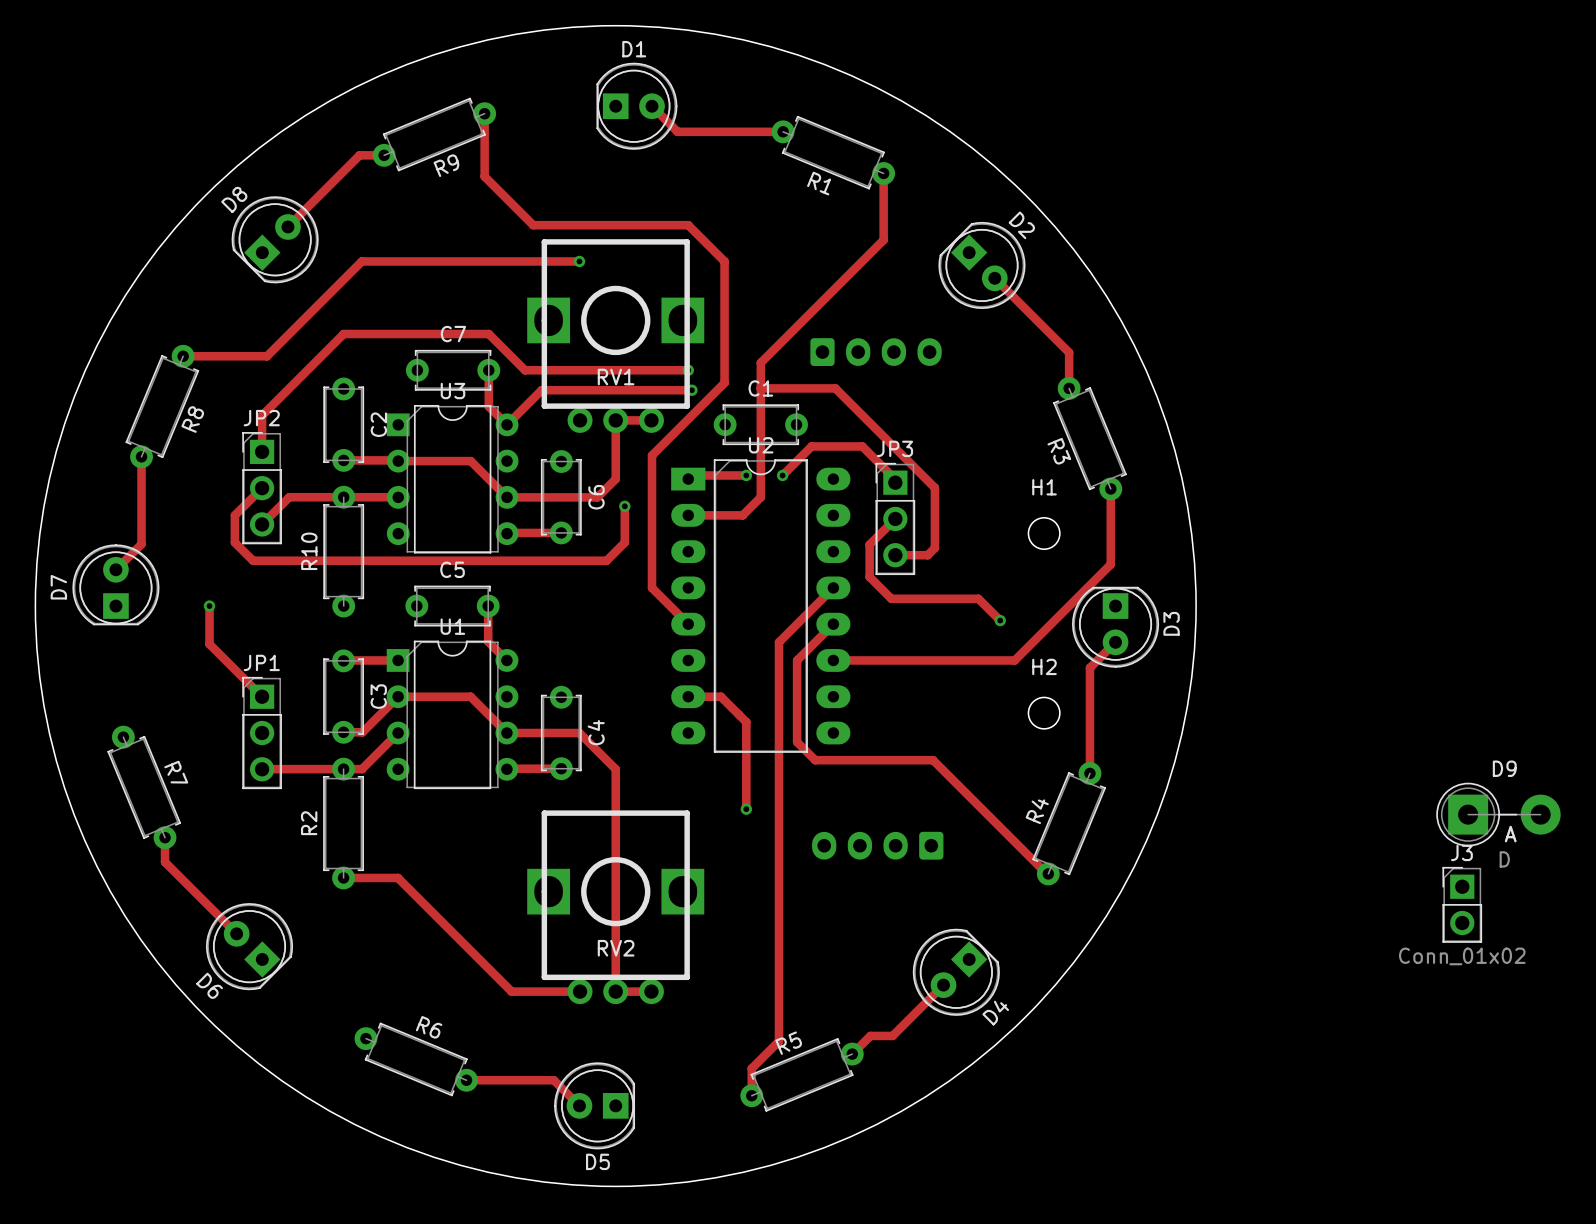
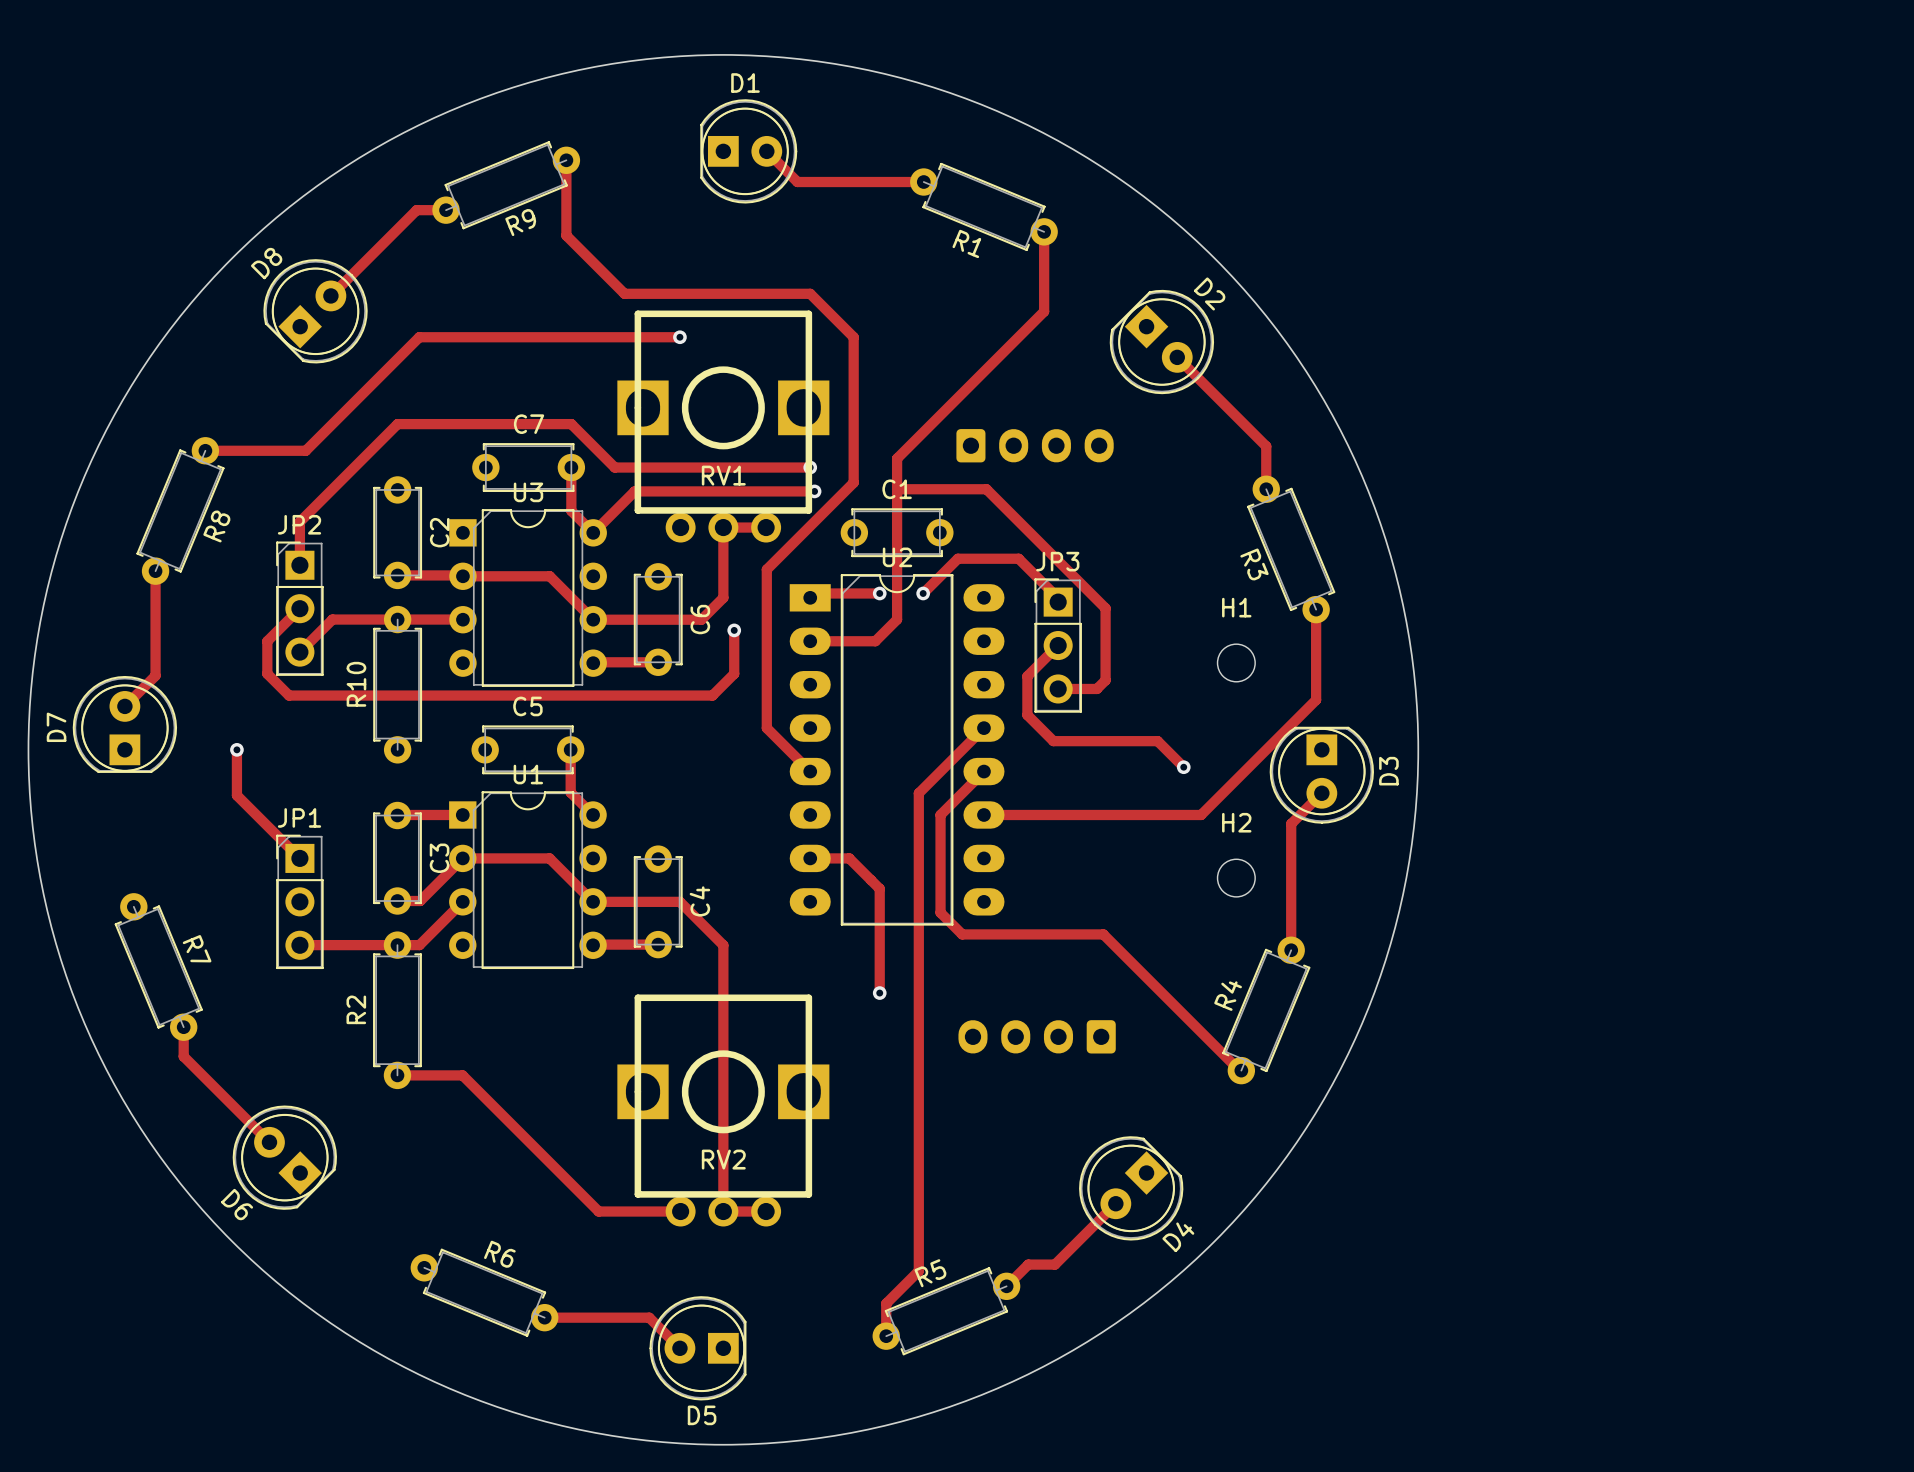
D9: D (1498, 814) -> none
J3: Conn_01x02 (1462, 904) -> none

